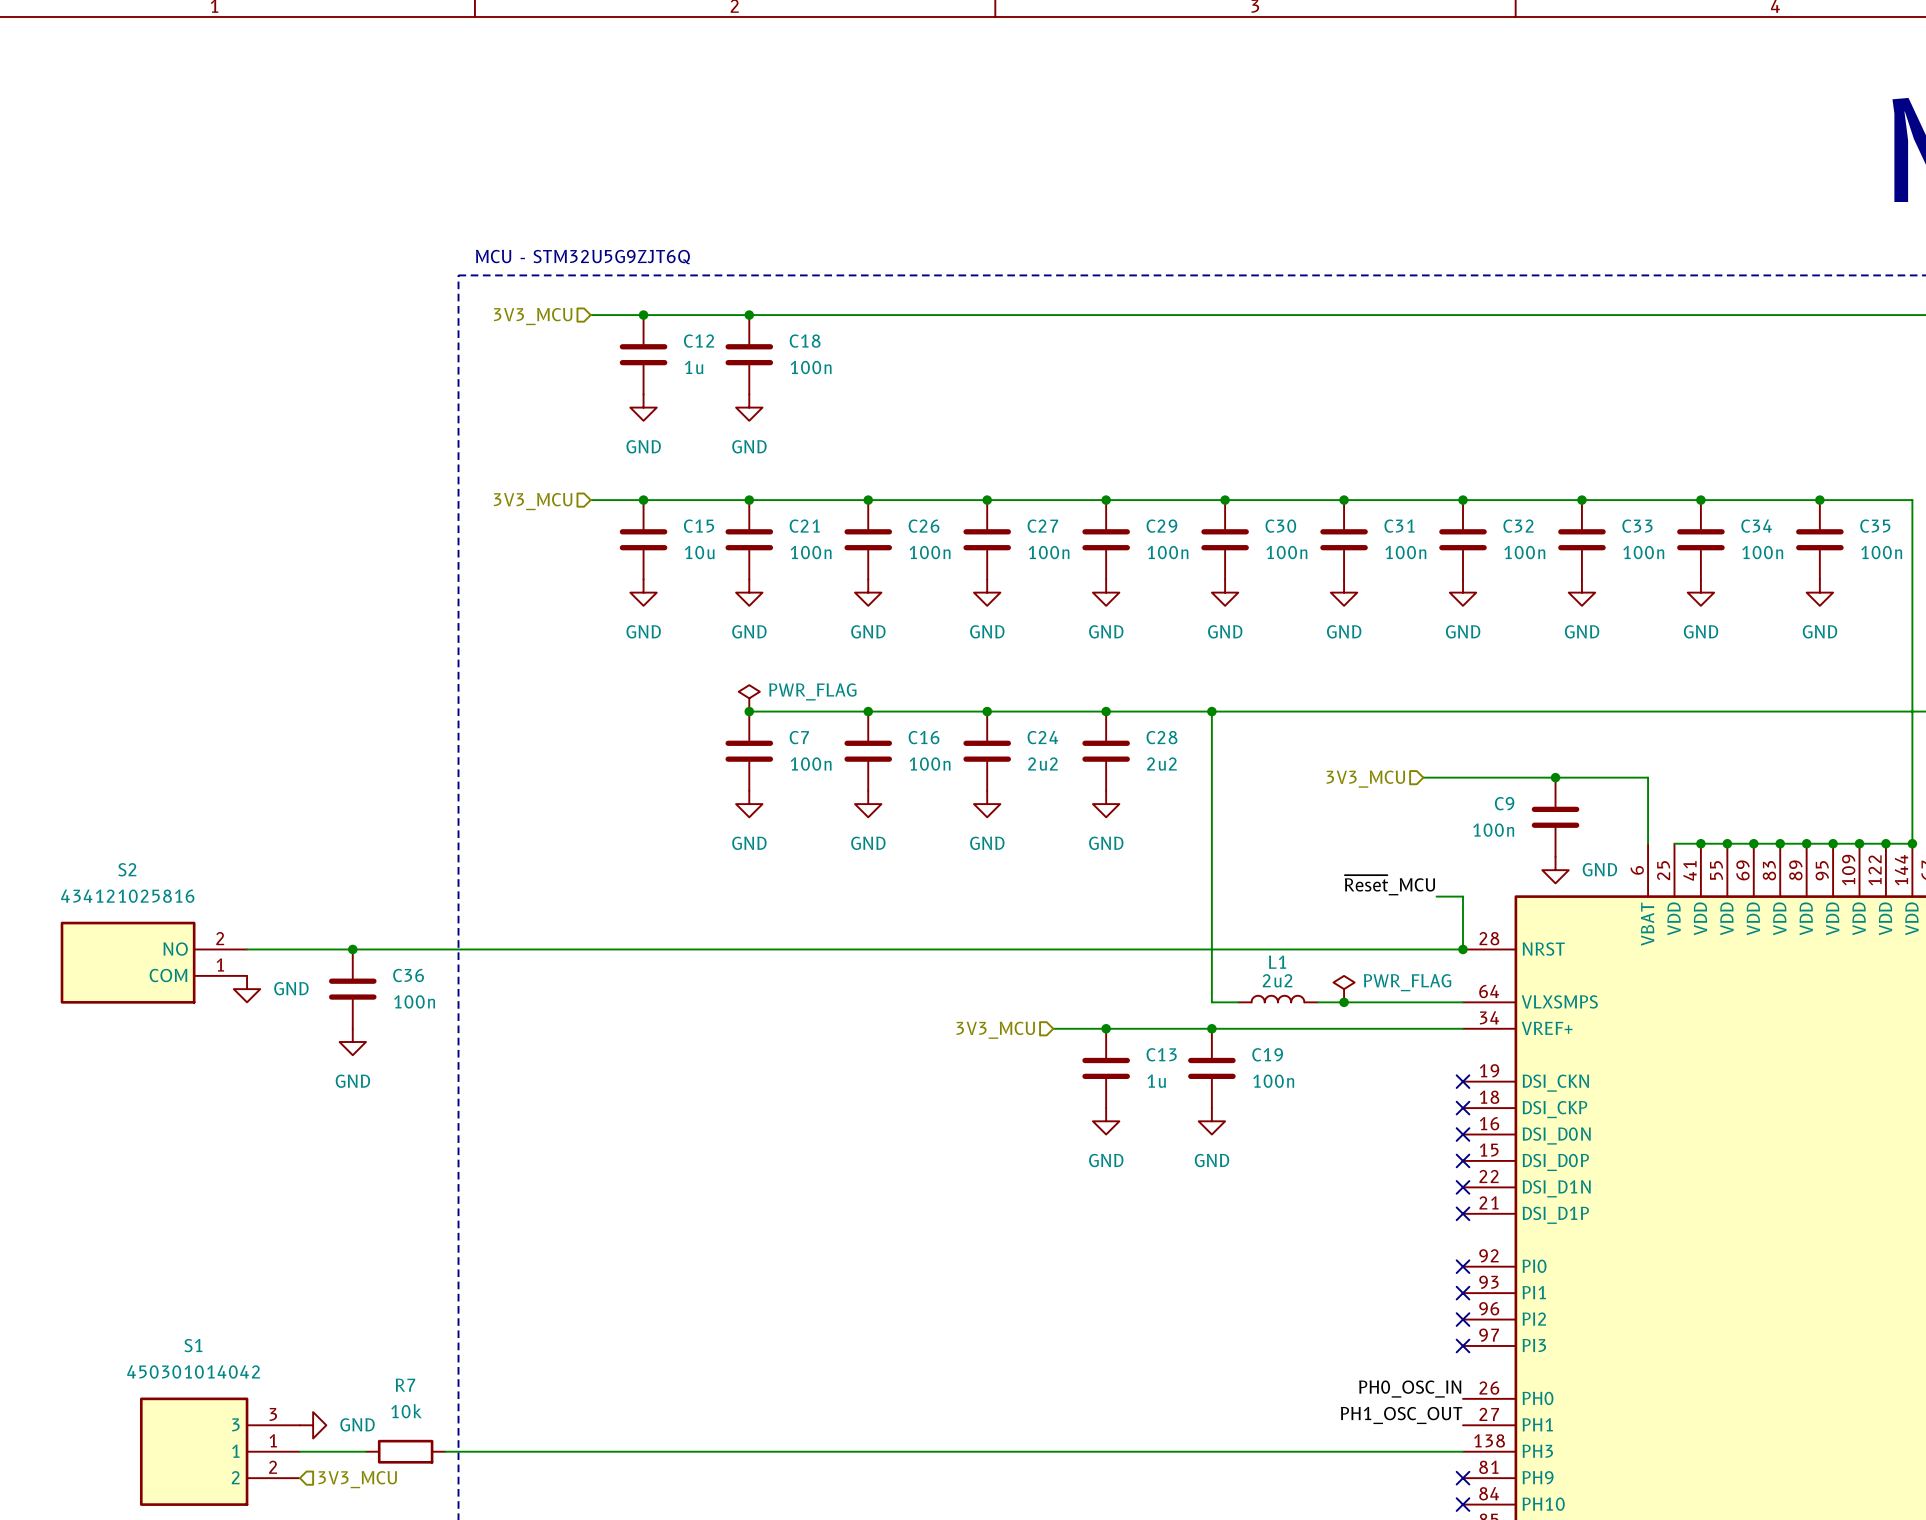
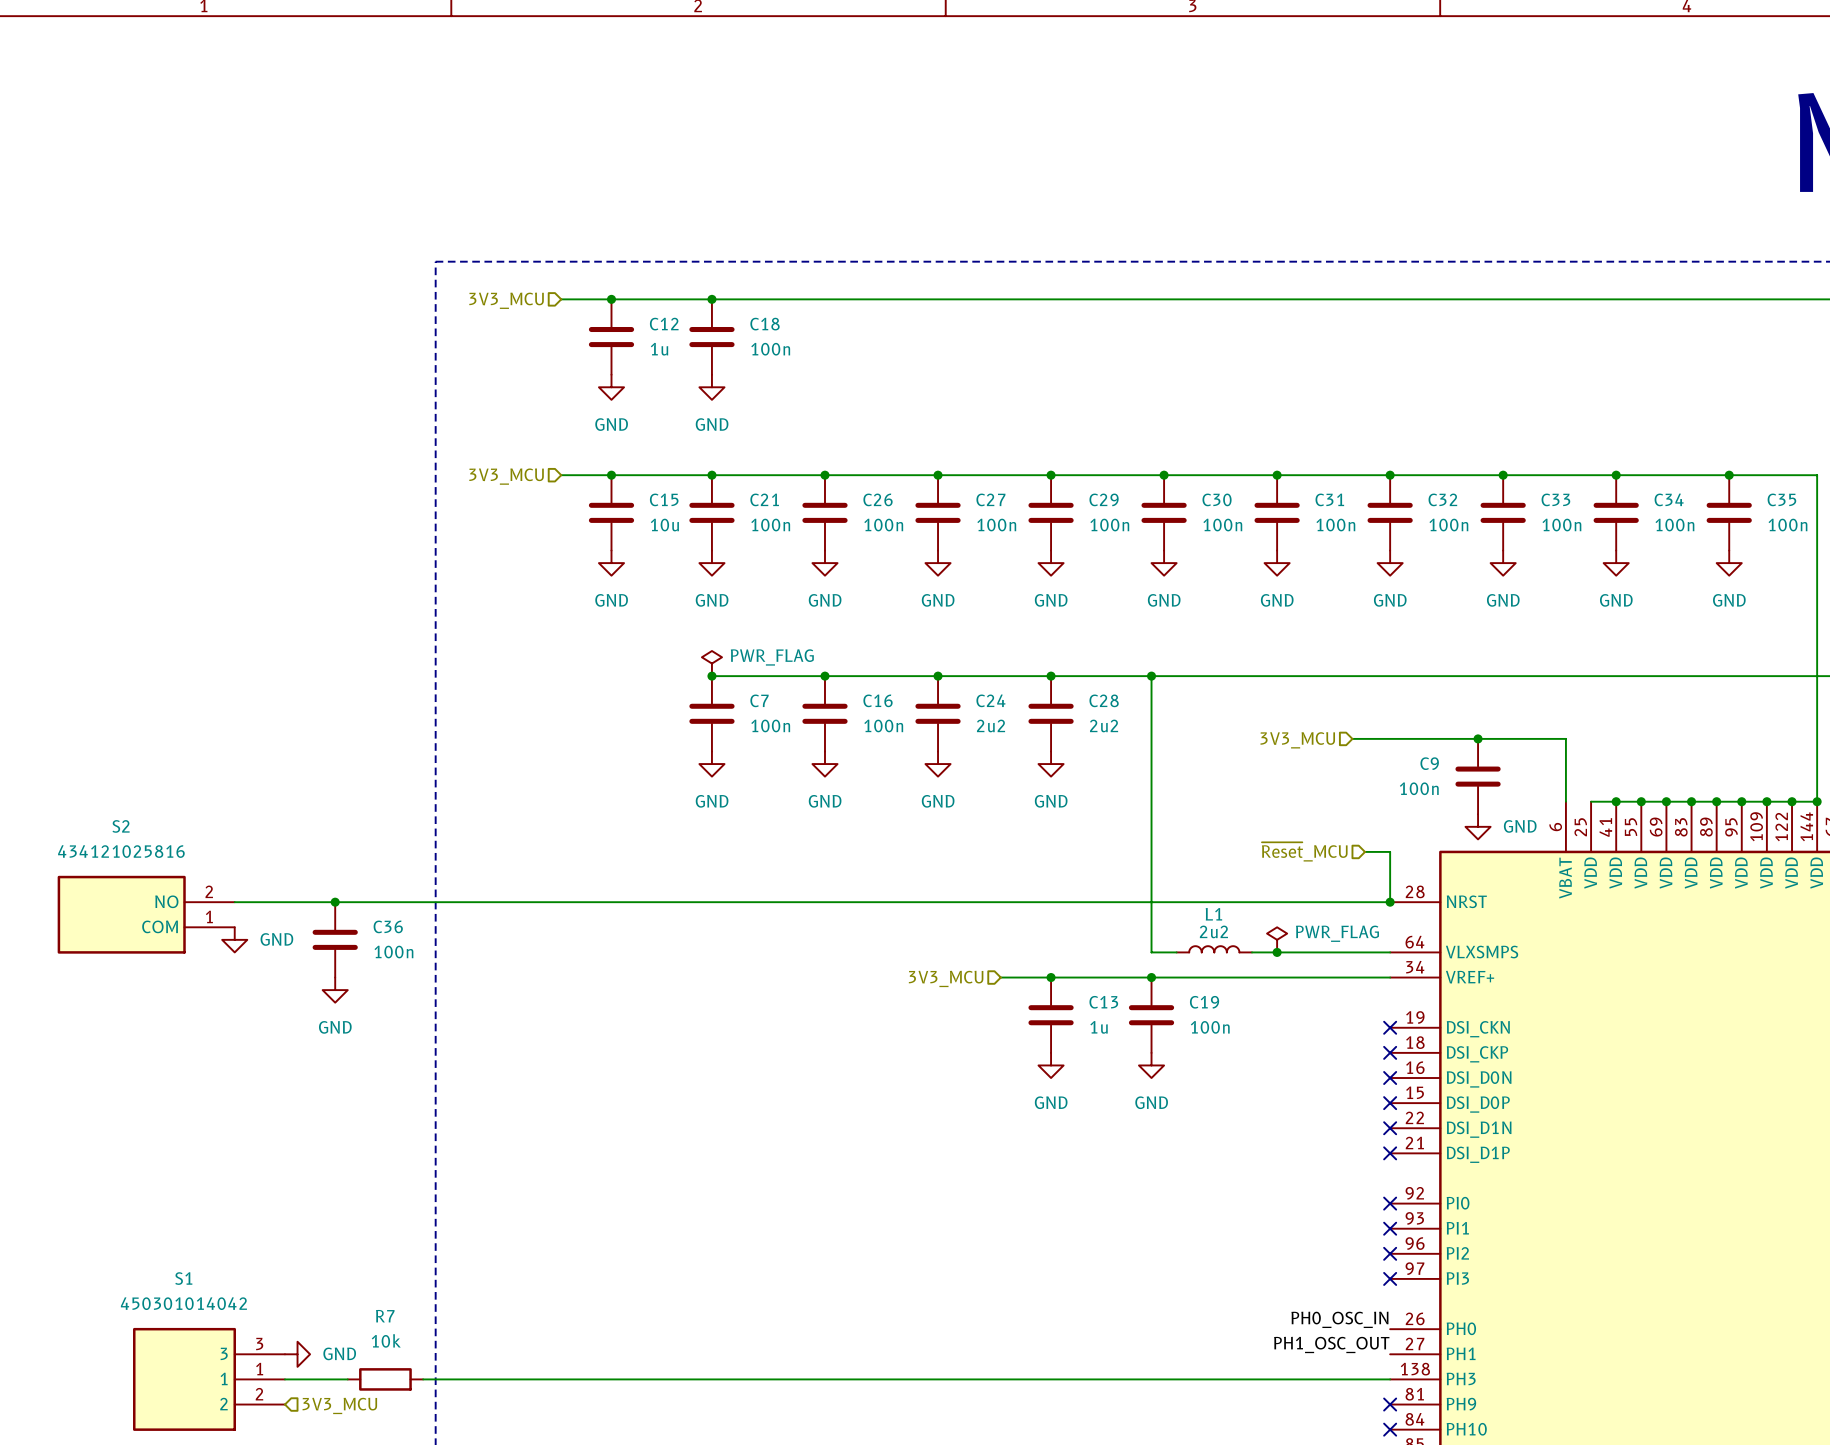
text: MCU - STM32U5G9ZJT6Q (582, 257) -> none
label: ~{Reset}_MCU (1389, 885) -> none
hierarchical label: none -> ~{Reset}_MCU (1304, 851)

